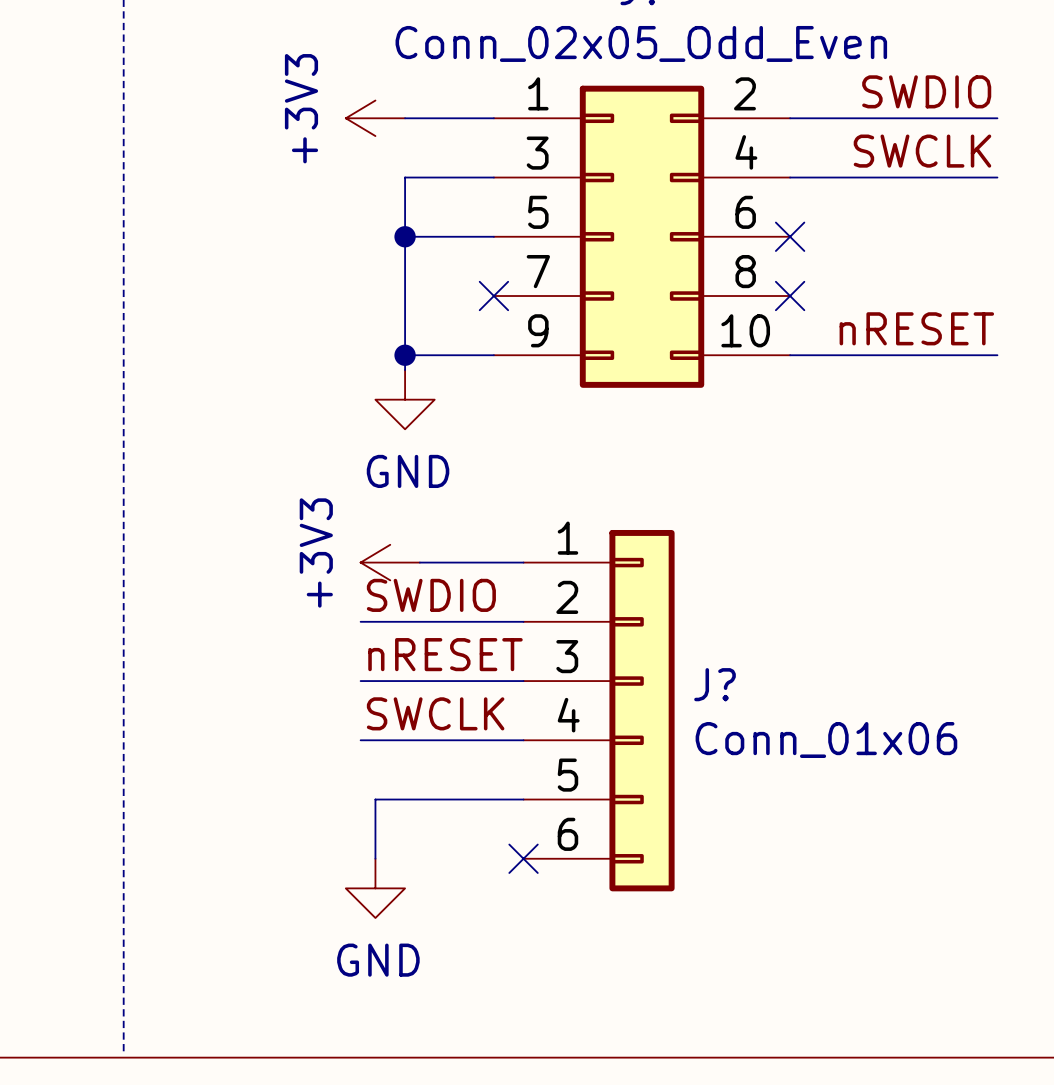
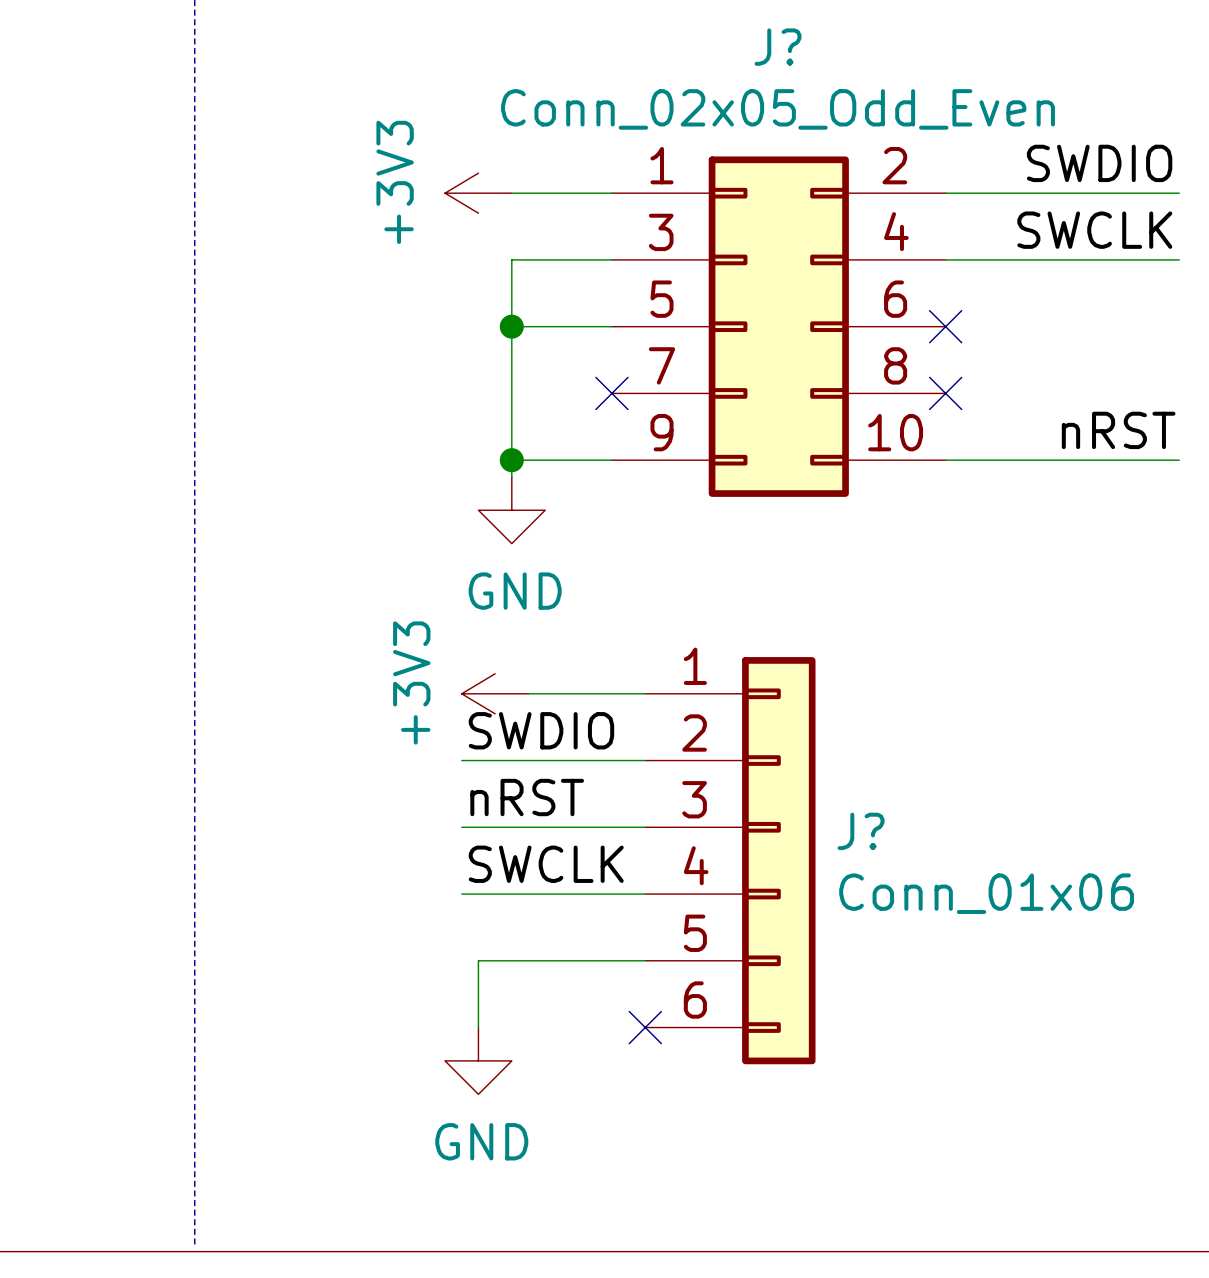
label: nRESET (916, 328) -> nRST (1118, 430)
label: nRESET (445, 654) -> nRST (527, 797)

